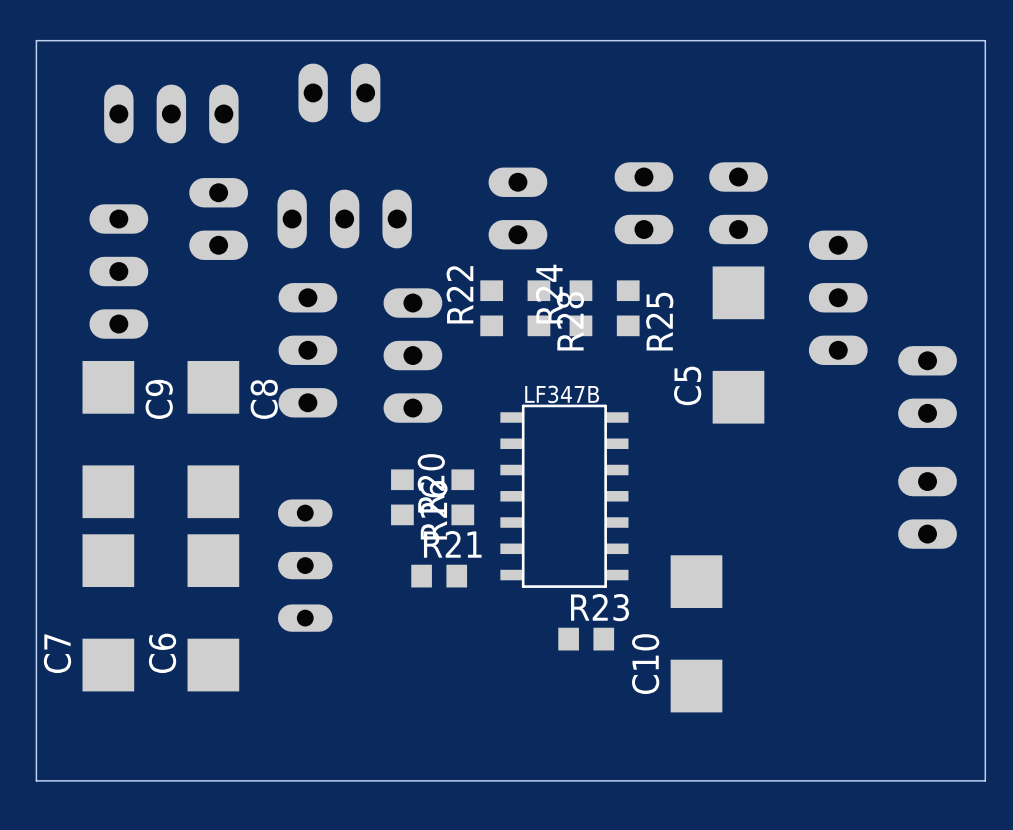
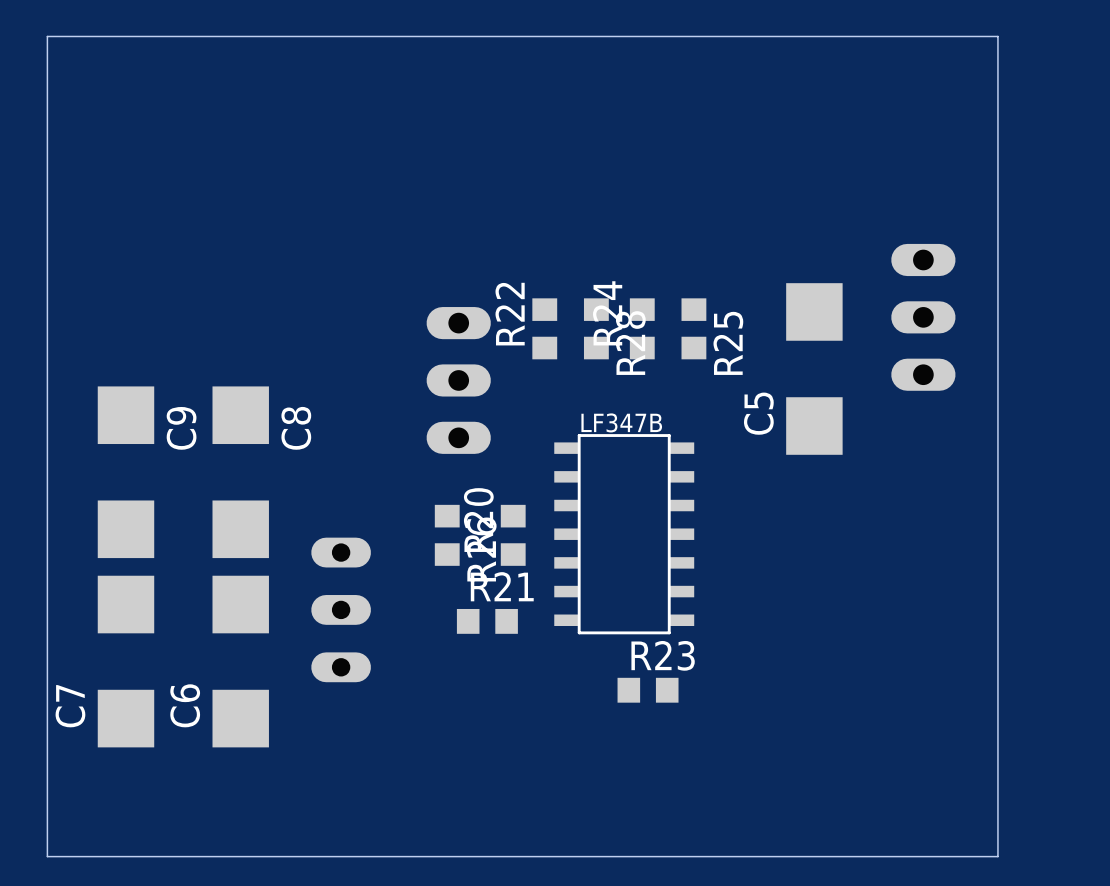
board edge: (906, 40) (985, 40) (985, 780) (36, 780) -> (997, 36) (997, 856) (47, 856) (47, 845)
part: (339, 92) -> none
part: (171, 113) -> none
part: (643, 203) -> none
part: (738, 203) -> none
part: (517, 208) -> none
part: (218, 219) -> none
part: (344, 219) -> none
part: (118, 271) -> none
part: (307, 350) -> none
part: (927, 387) -> none
part: (927, 507) -> none
C10: (696, 633) -> none

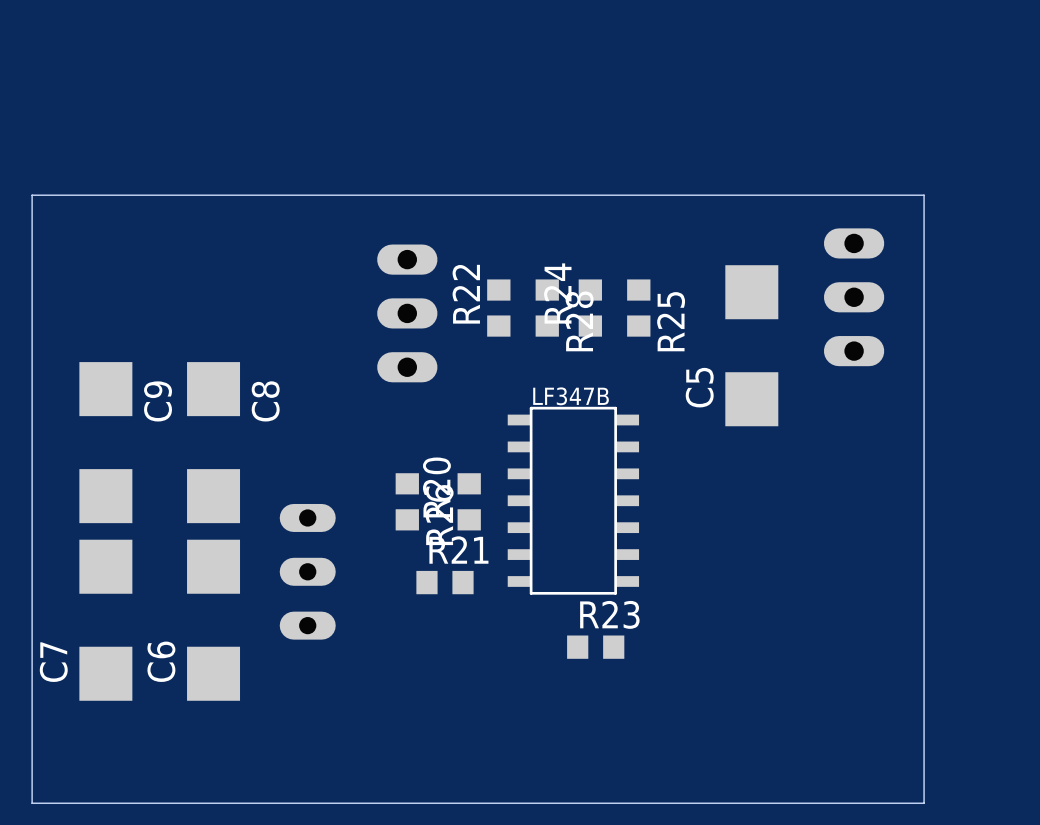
board edge: (997, 208) (997, 36) (47, 36) (47, 208) -> (924, 195) (32, 195)
part position: (458, 380) -> (407, 313)

